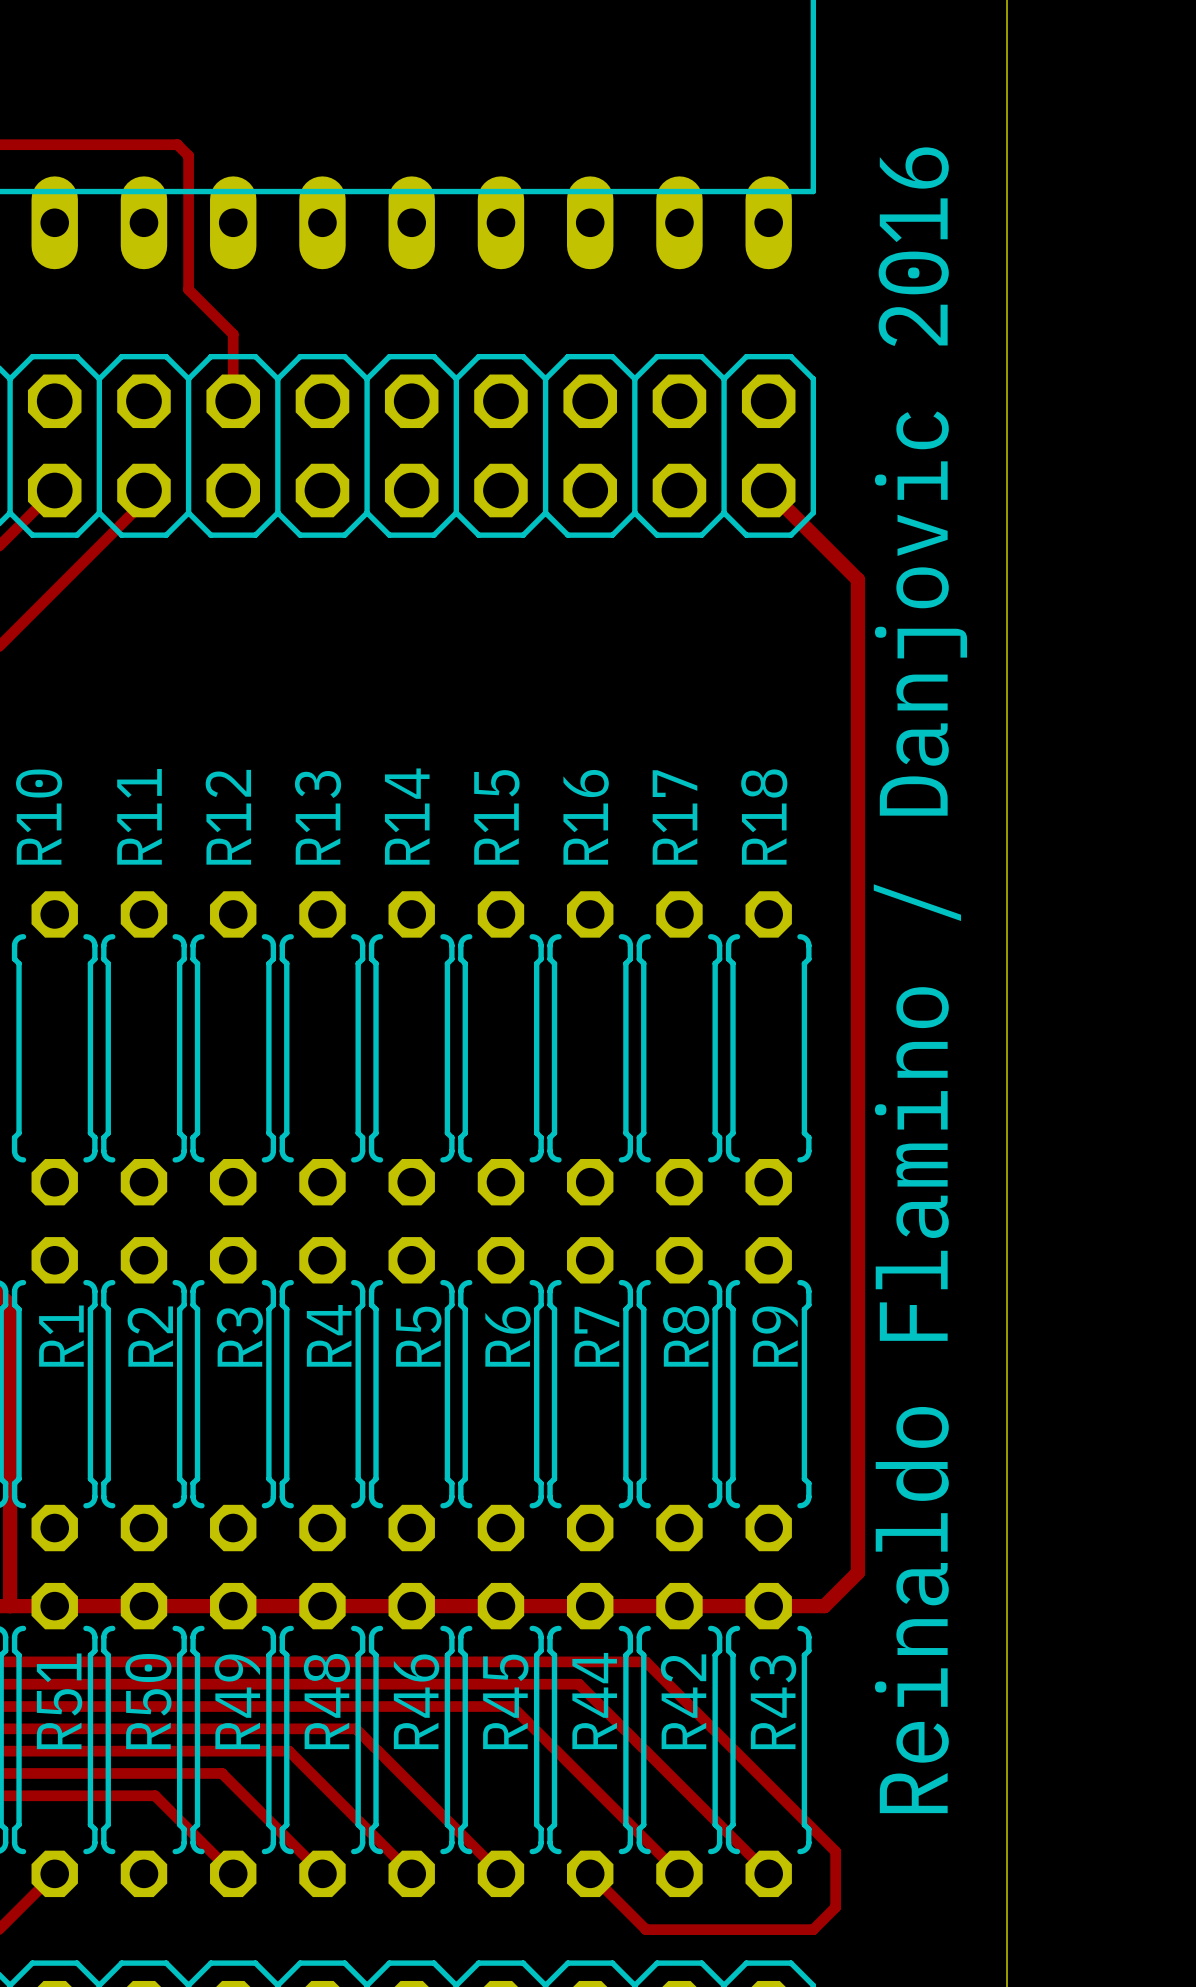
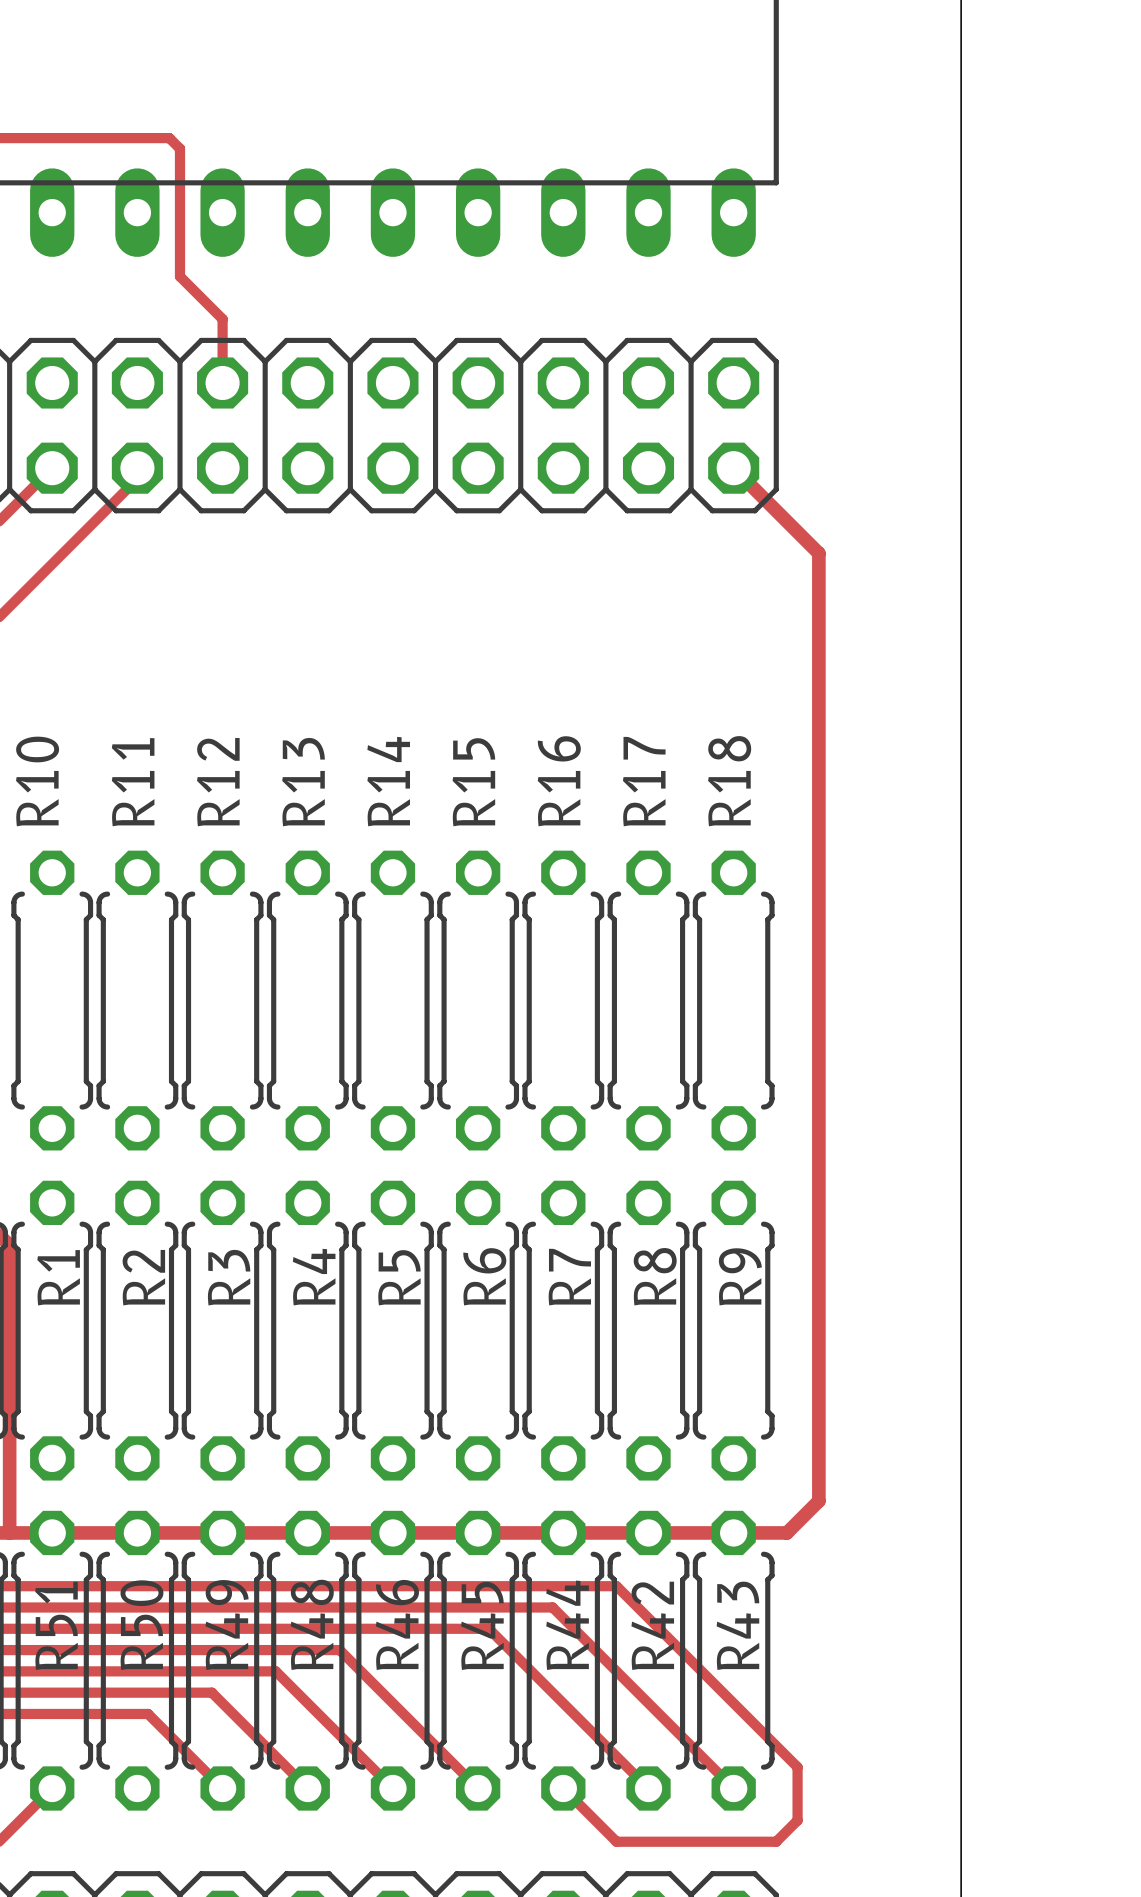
text: Reinaldo Flamino / Danjovic 2016 (920, 980) -> none

